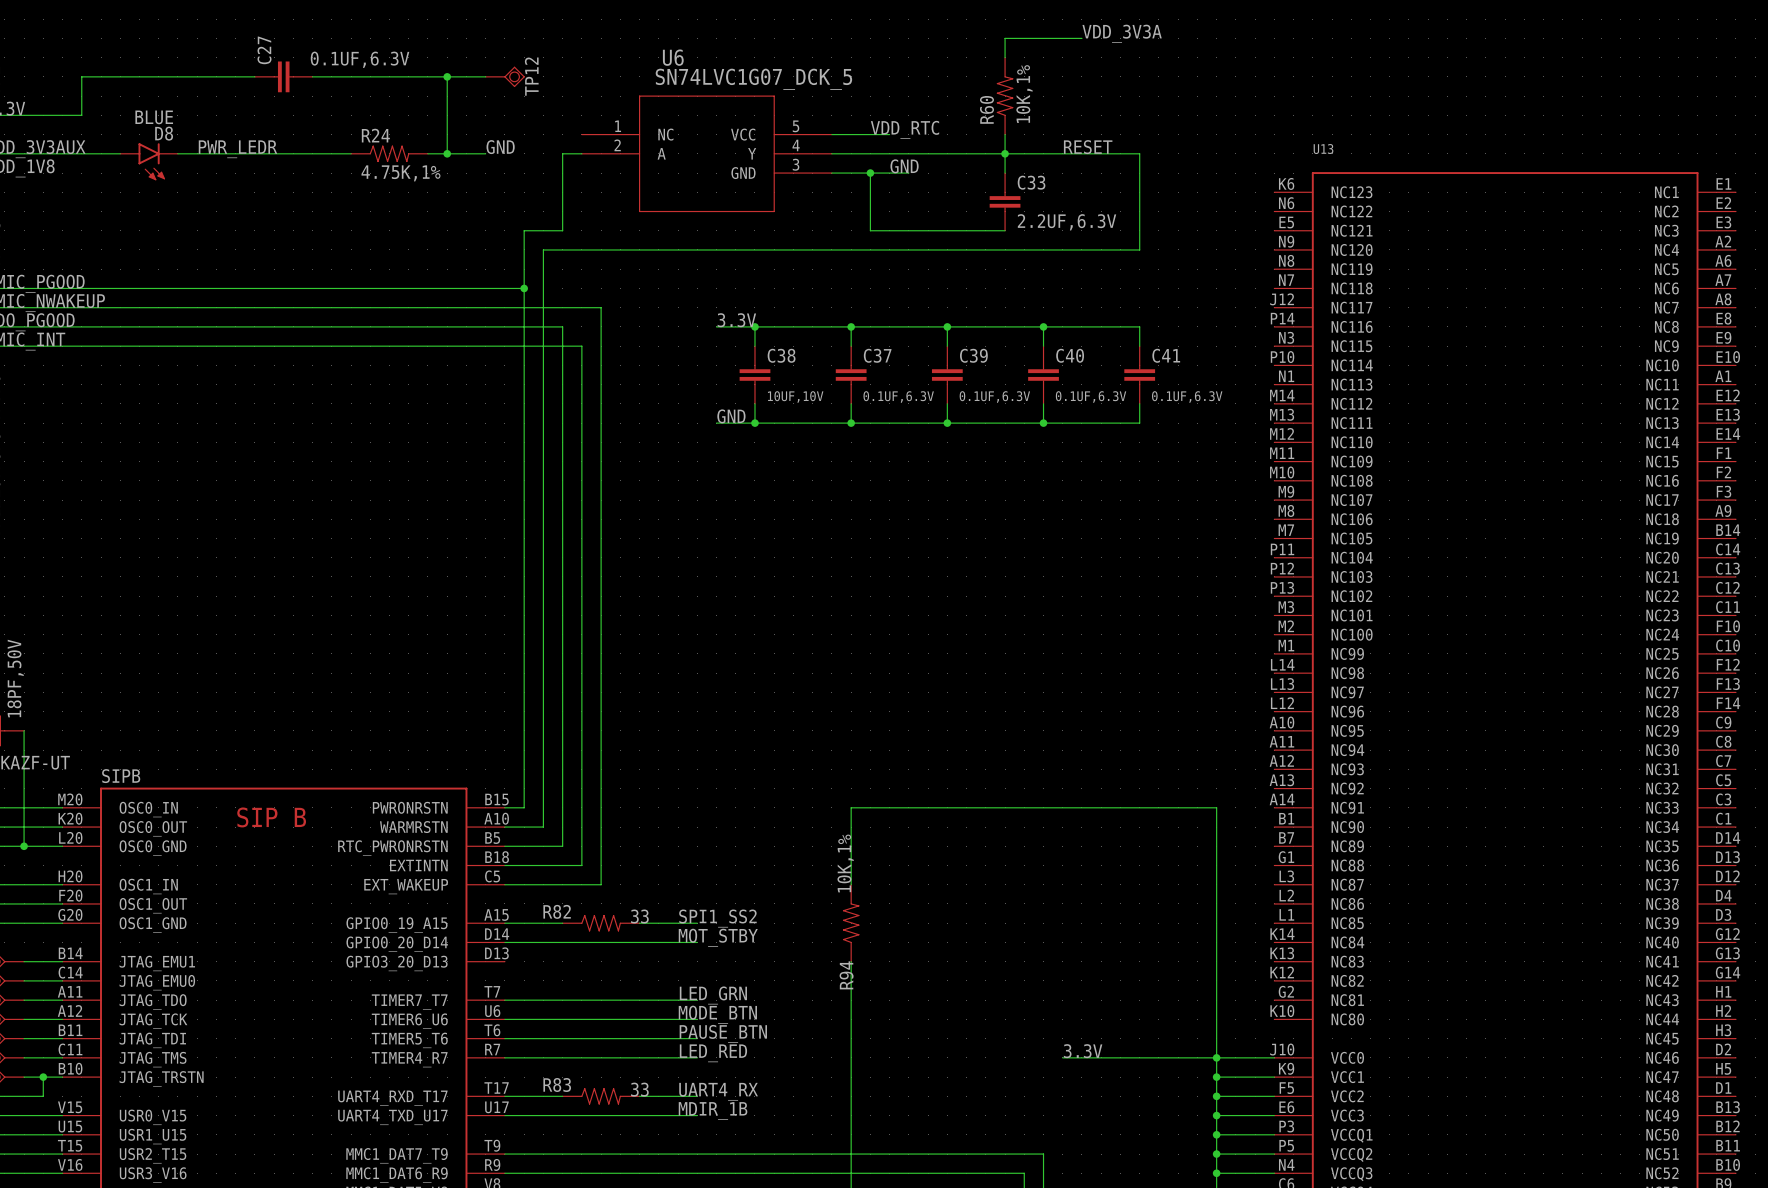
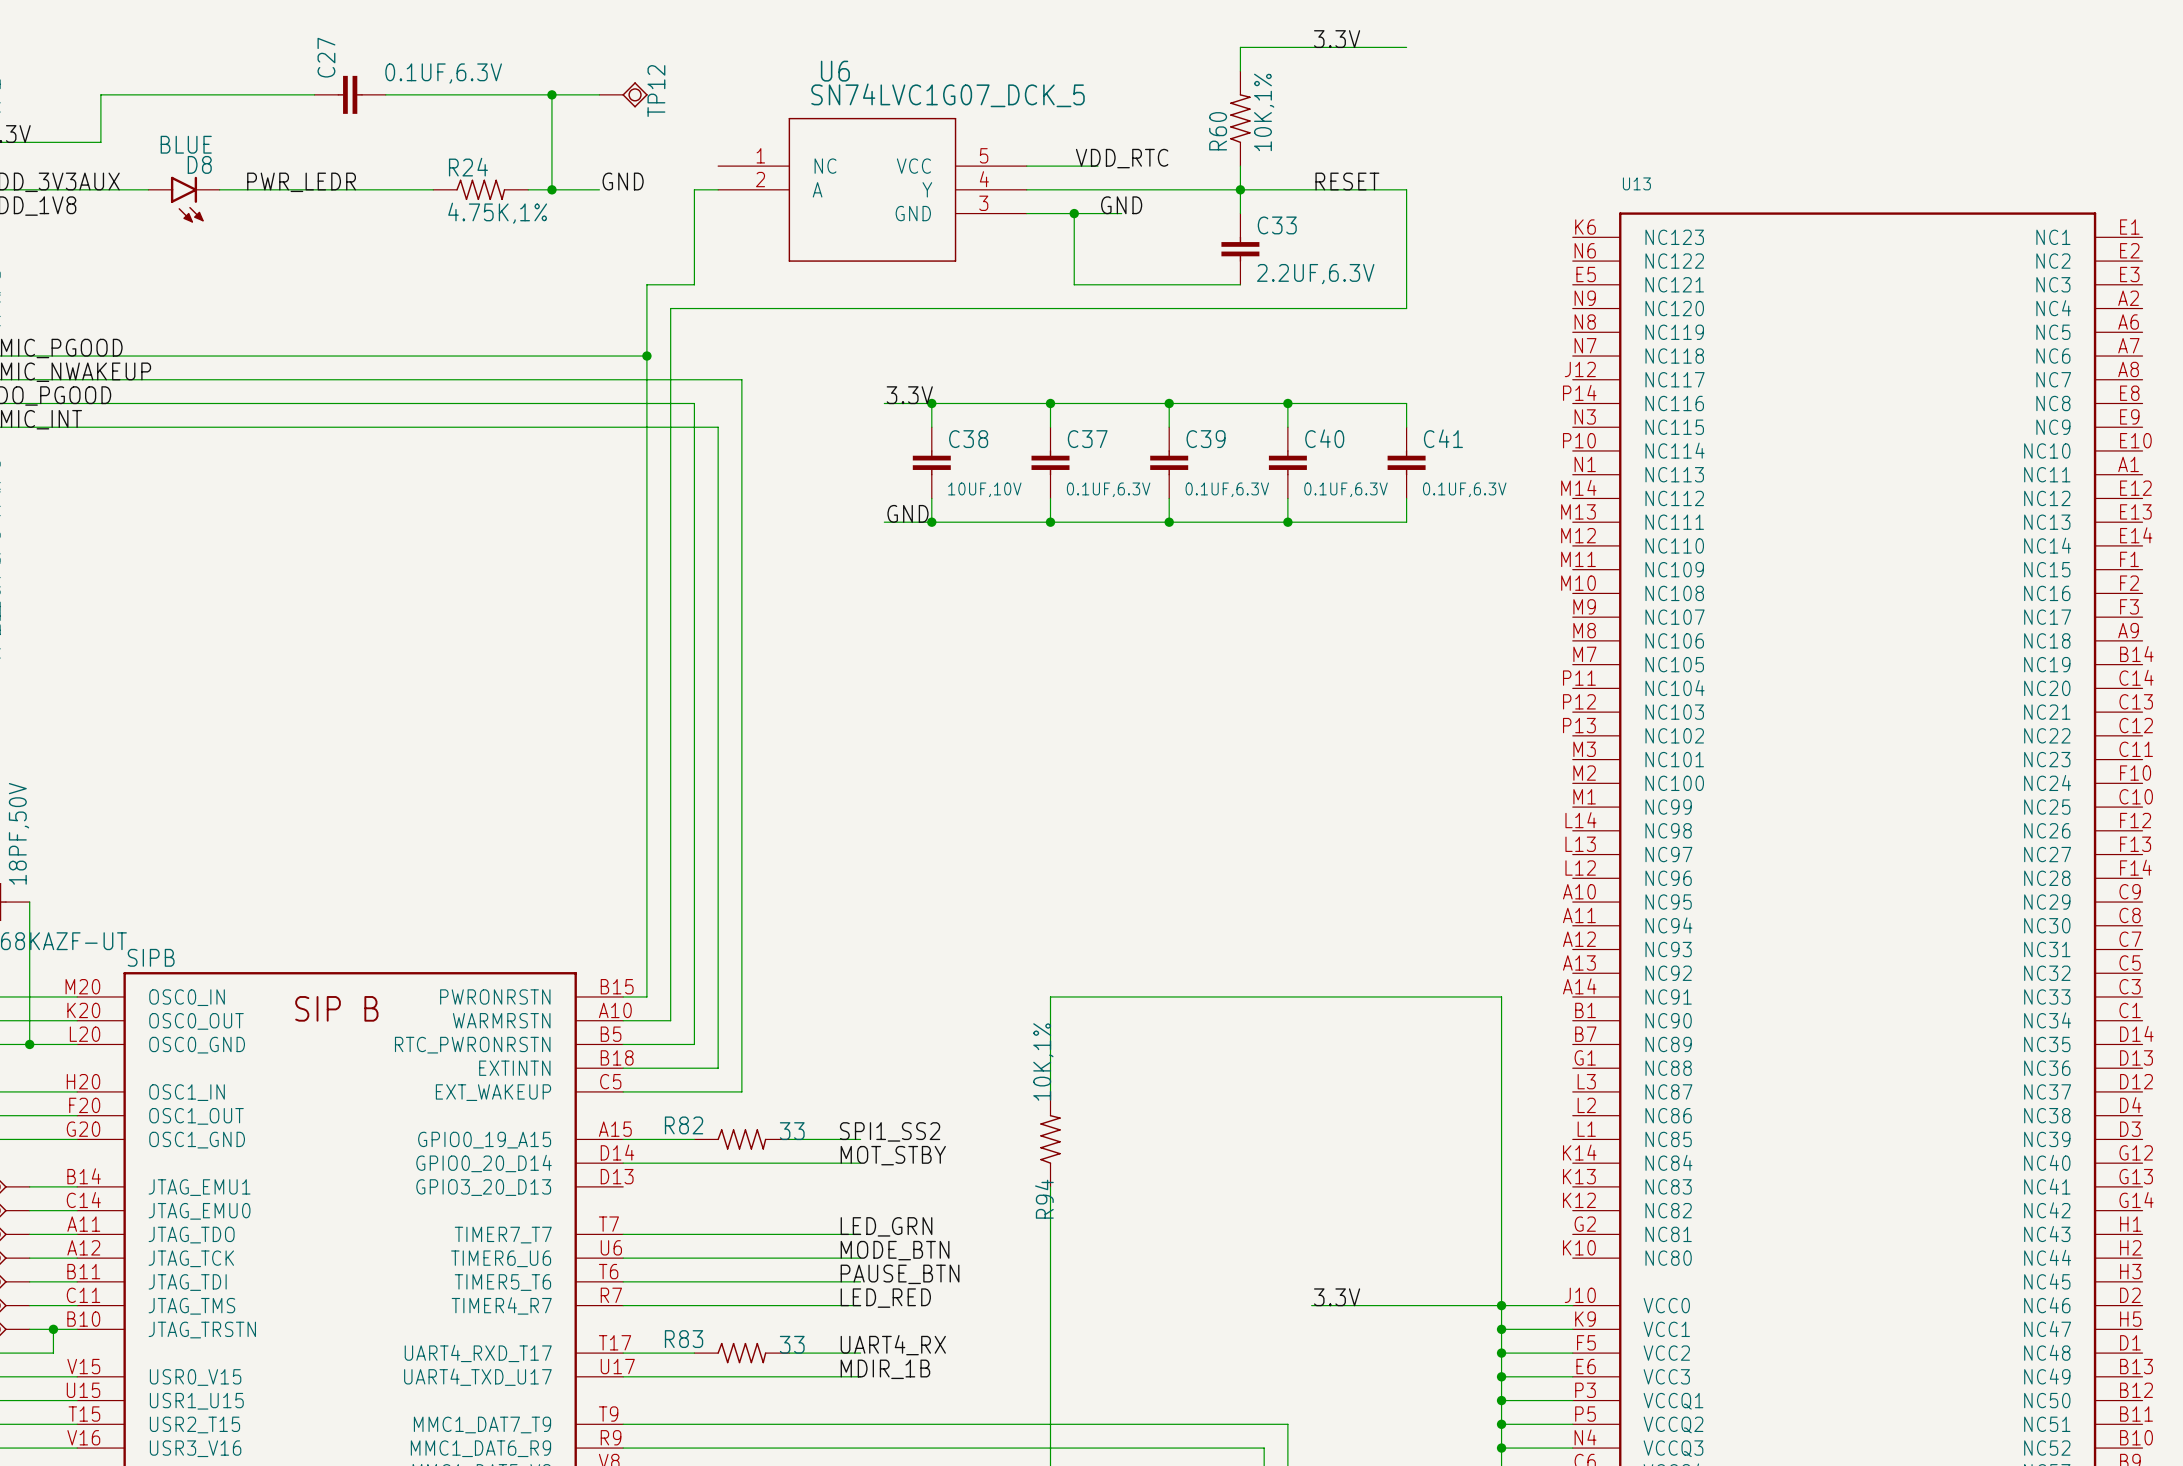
label: none -> 3.3V (1337, 39)
label: VDD_3V3A (1122, 33) -> none
wire: none -> (1335, 47) (1406, 47)

